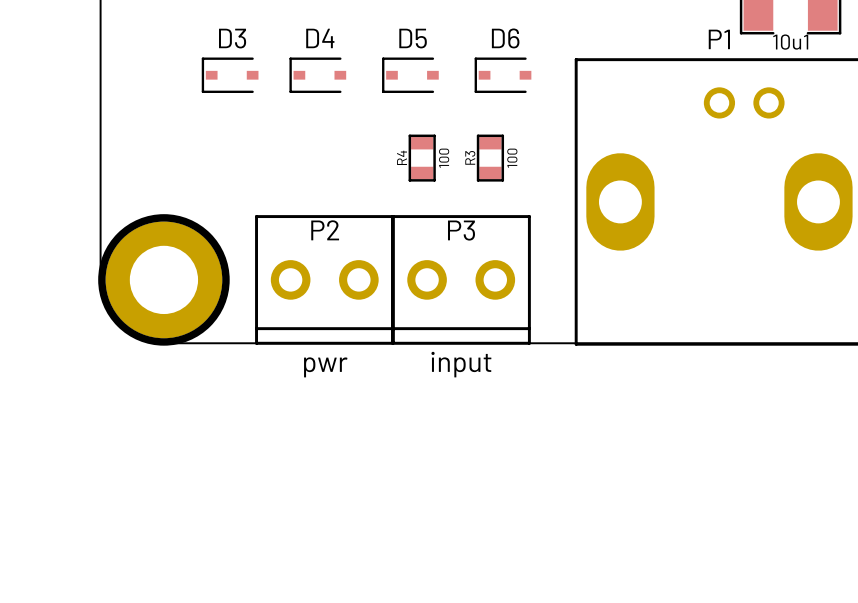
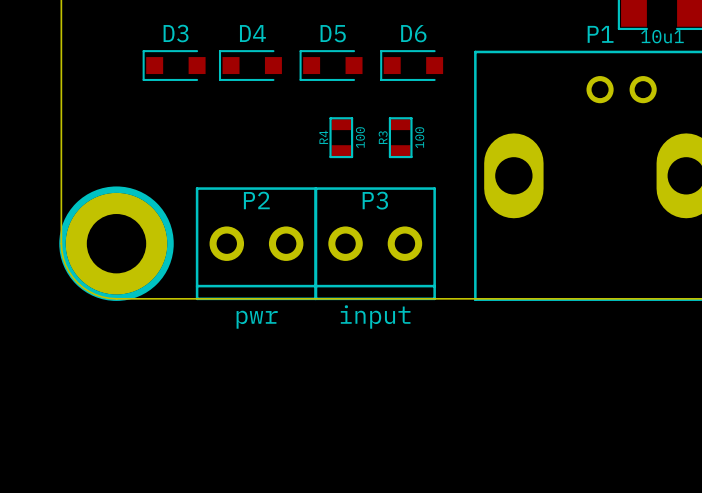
D3 footprint: [201, 57, 259, 93] -> [142, 50, 206, 81]
D4 footprint: [289, 57, 347, 93] -> [218, 50, 282, 81]
D5 footprint: [382, 57, 439, 93] -> [299, 50, 363, 81]
D6 footprint: [474, 57, 532, 93] -> [380, 50, 444, 81]

